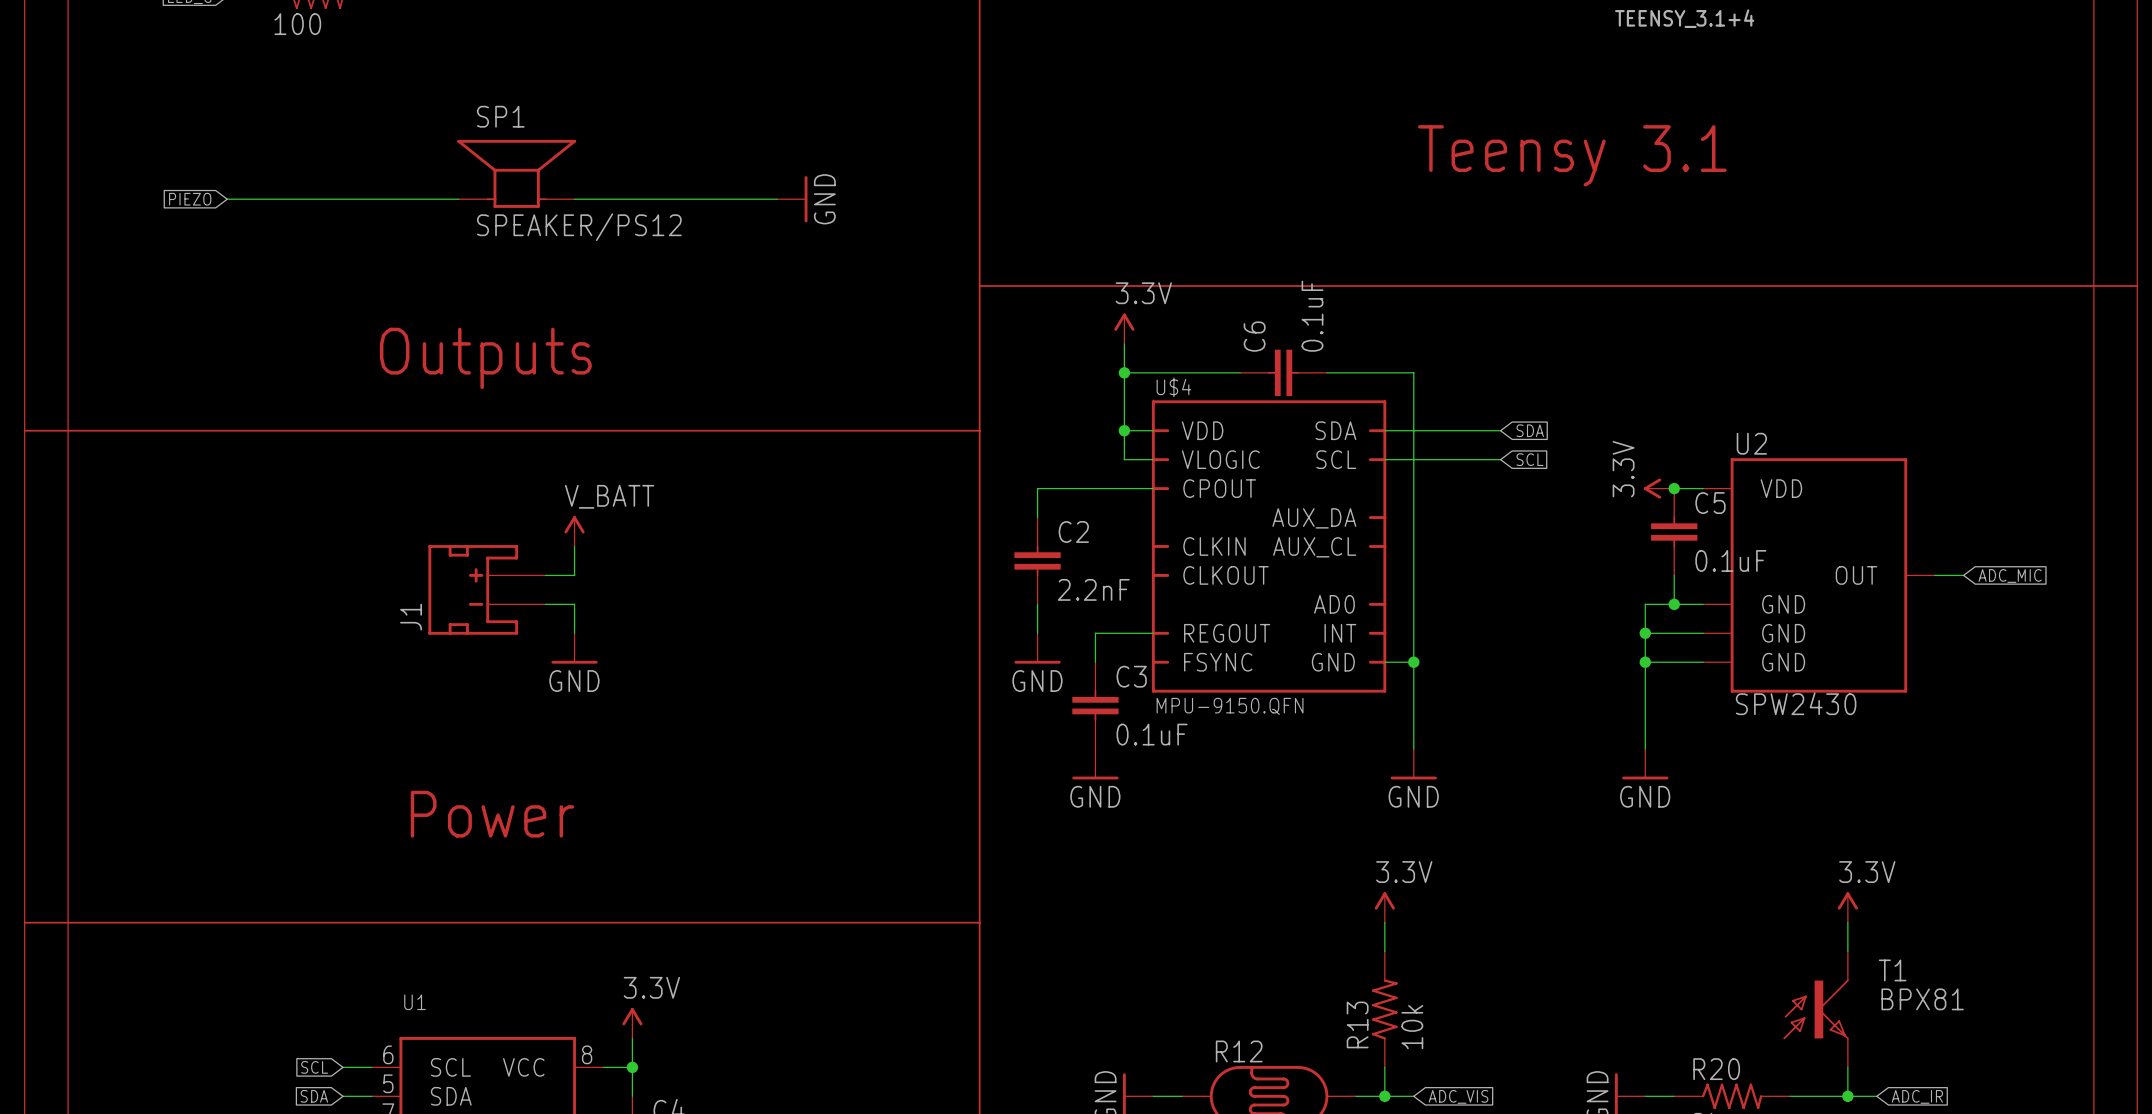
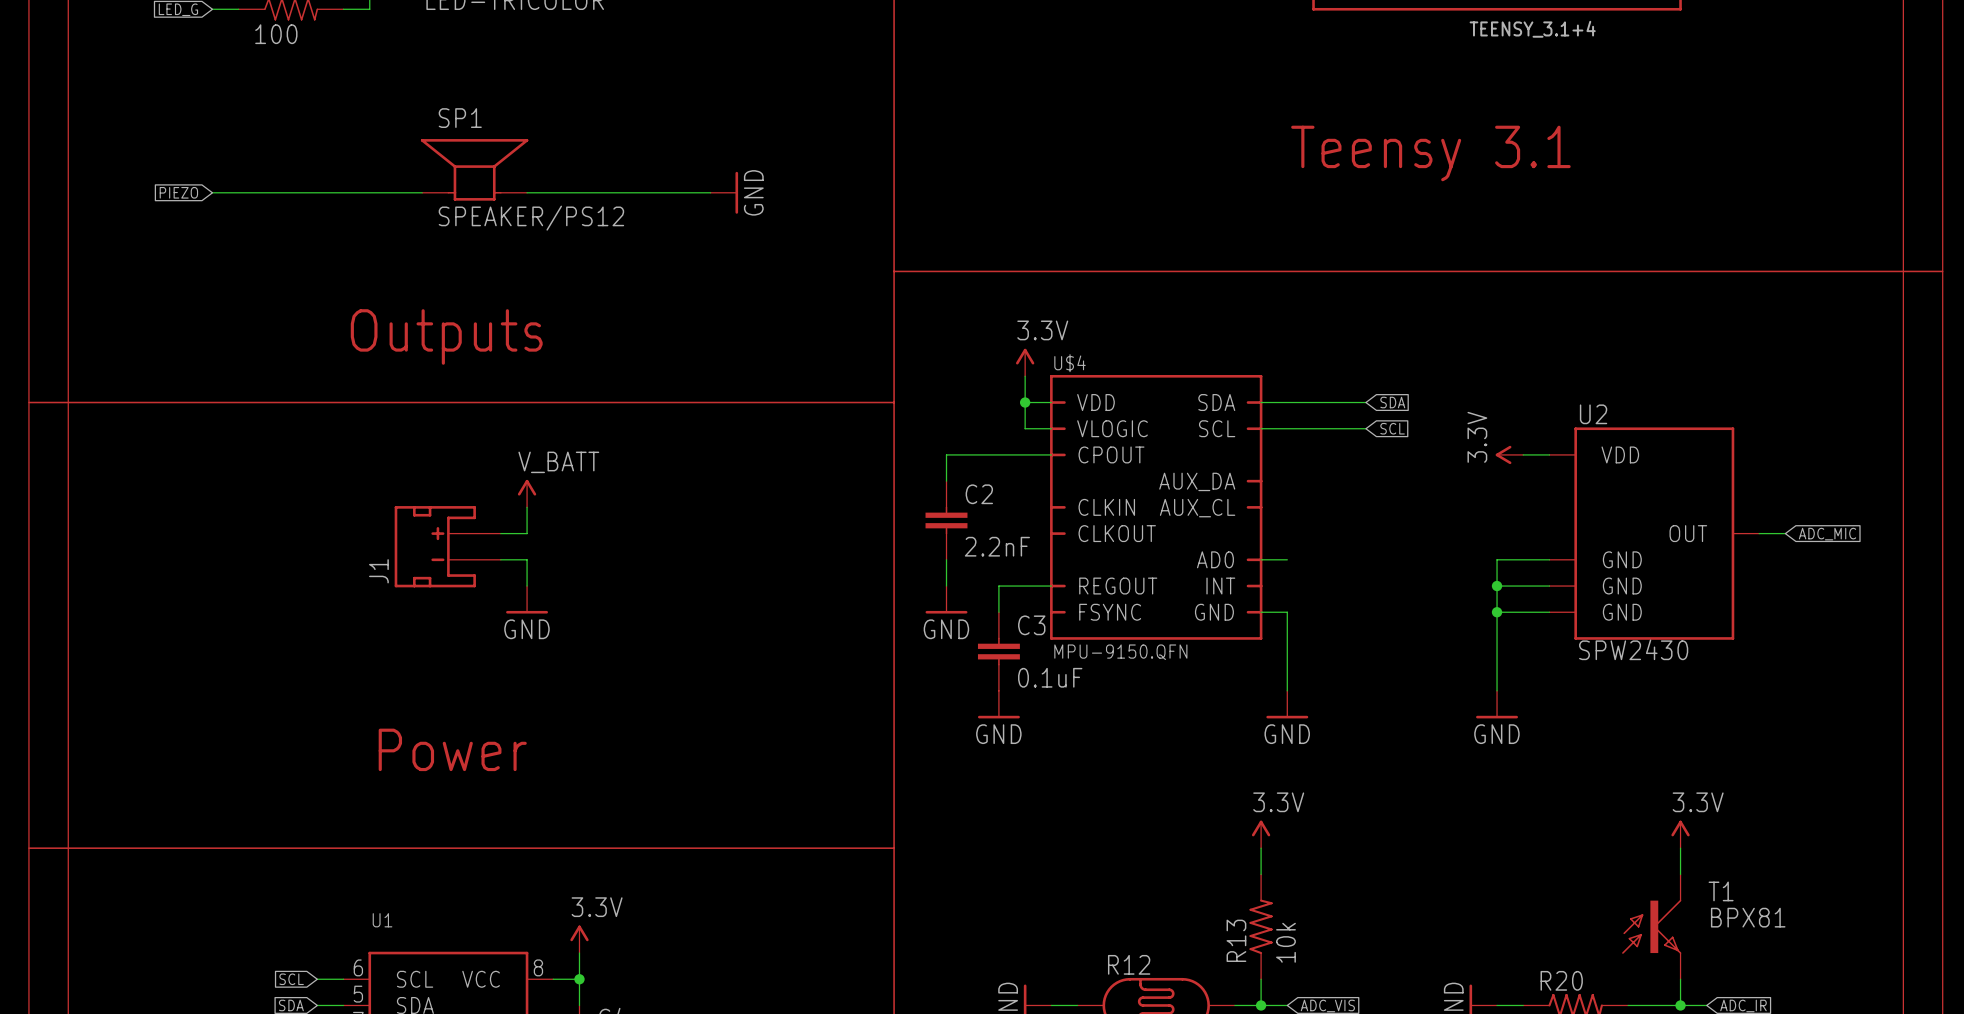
power symbol position: 3.3V (1124, 328) -> 3.3V (1025, 362)
wire: (1124, 372) (1240, 372) -> none
junction: (1124, 372) -> none
C6: 0.1uF (1283, 372) -> none
wire: (1326, 372) (1413, 372) (1413, 662) -> none
junction: (1674, 488) -> none
C5: 0.1uF (1674, 532) -> none
wire: (1674, 575) (1674, 604) -> none
wire: none -> (1261, 559) (1287, 559)
junction: (1674, 604) -> none
junction: (1413, 662) -> none

